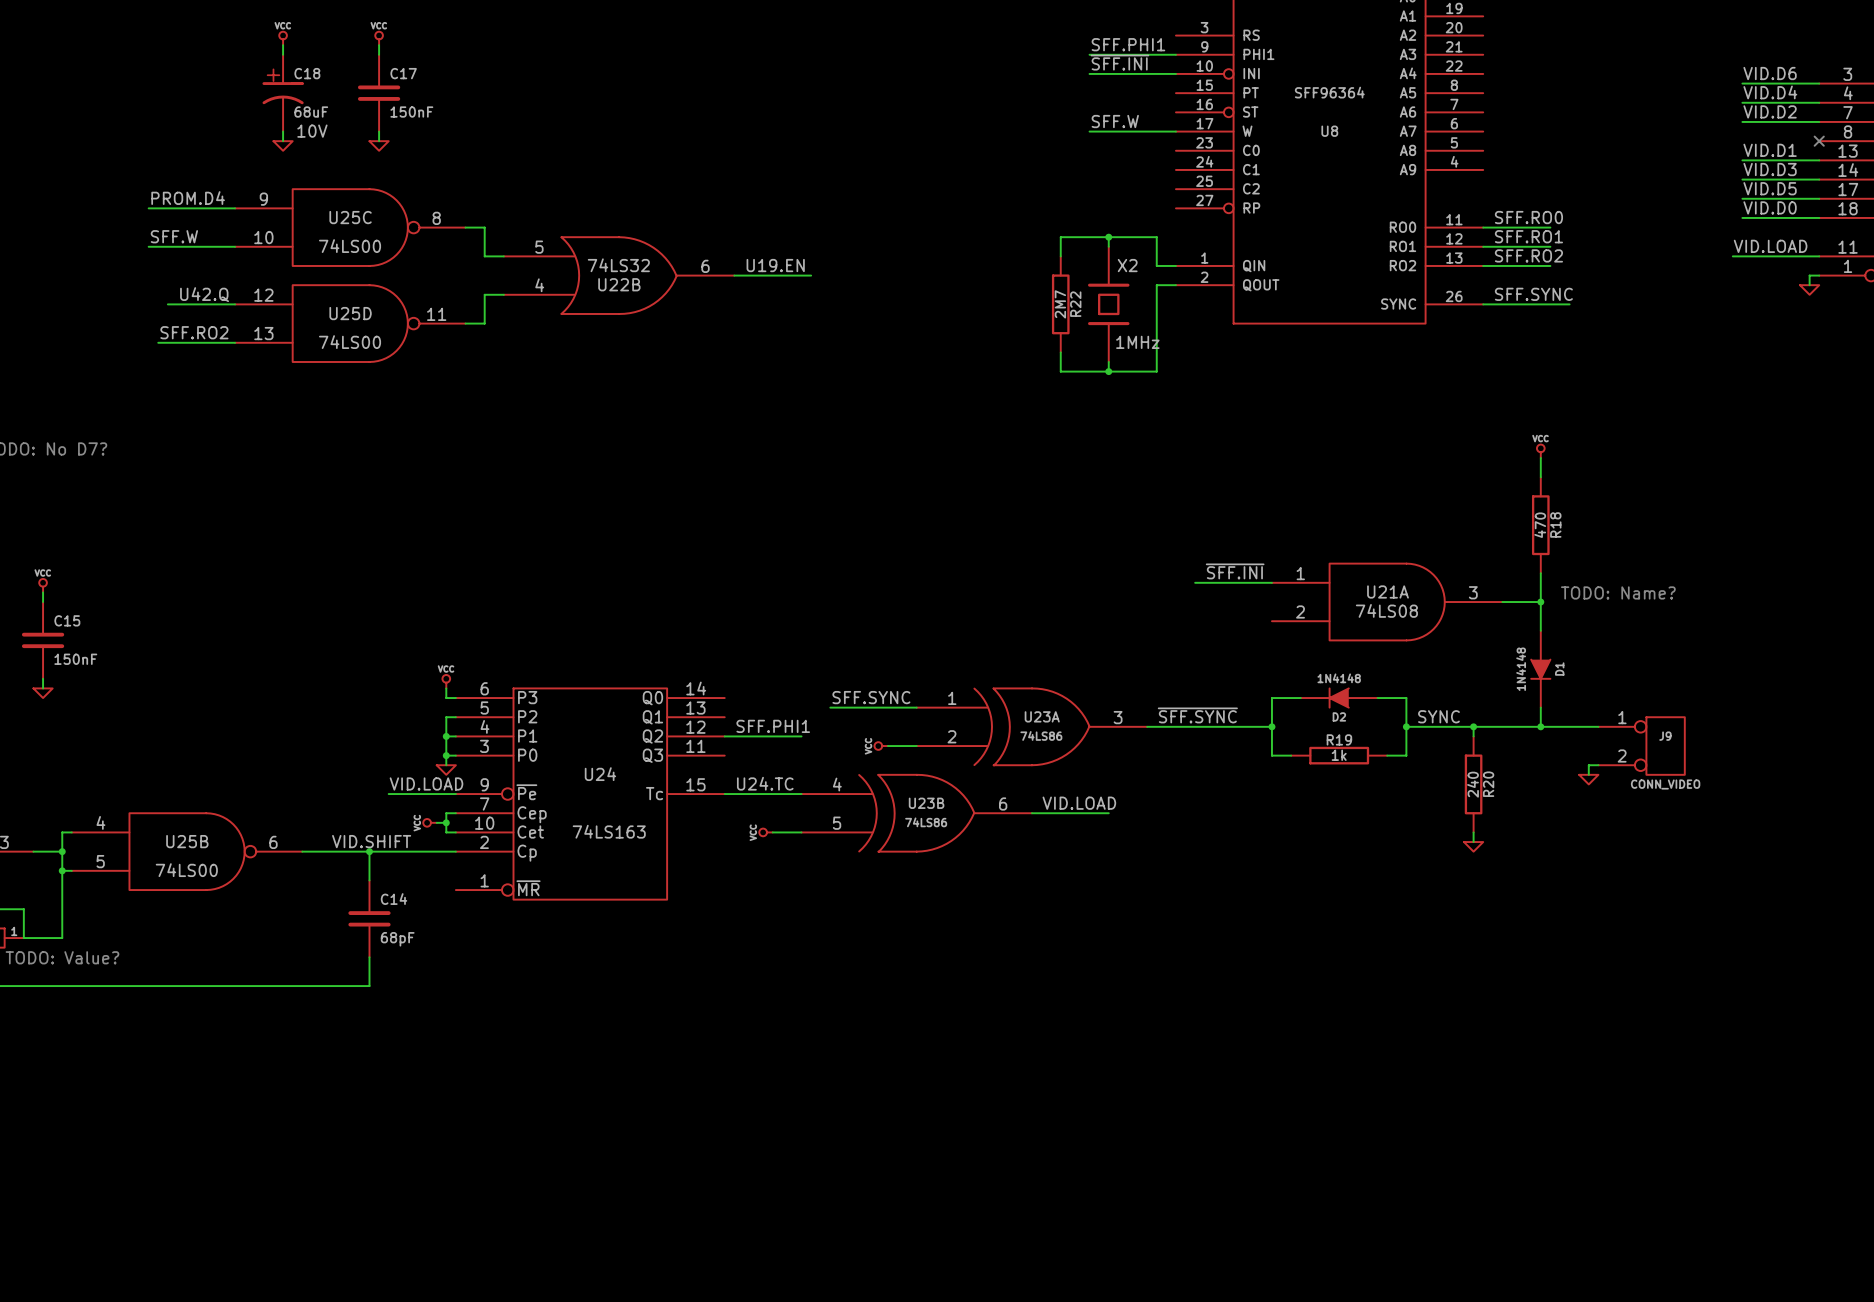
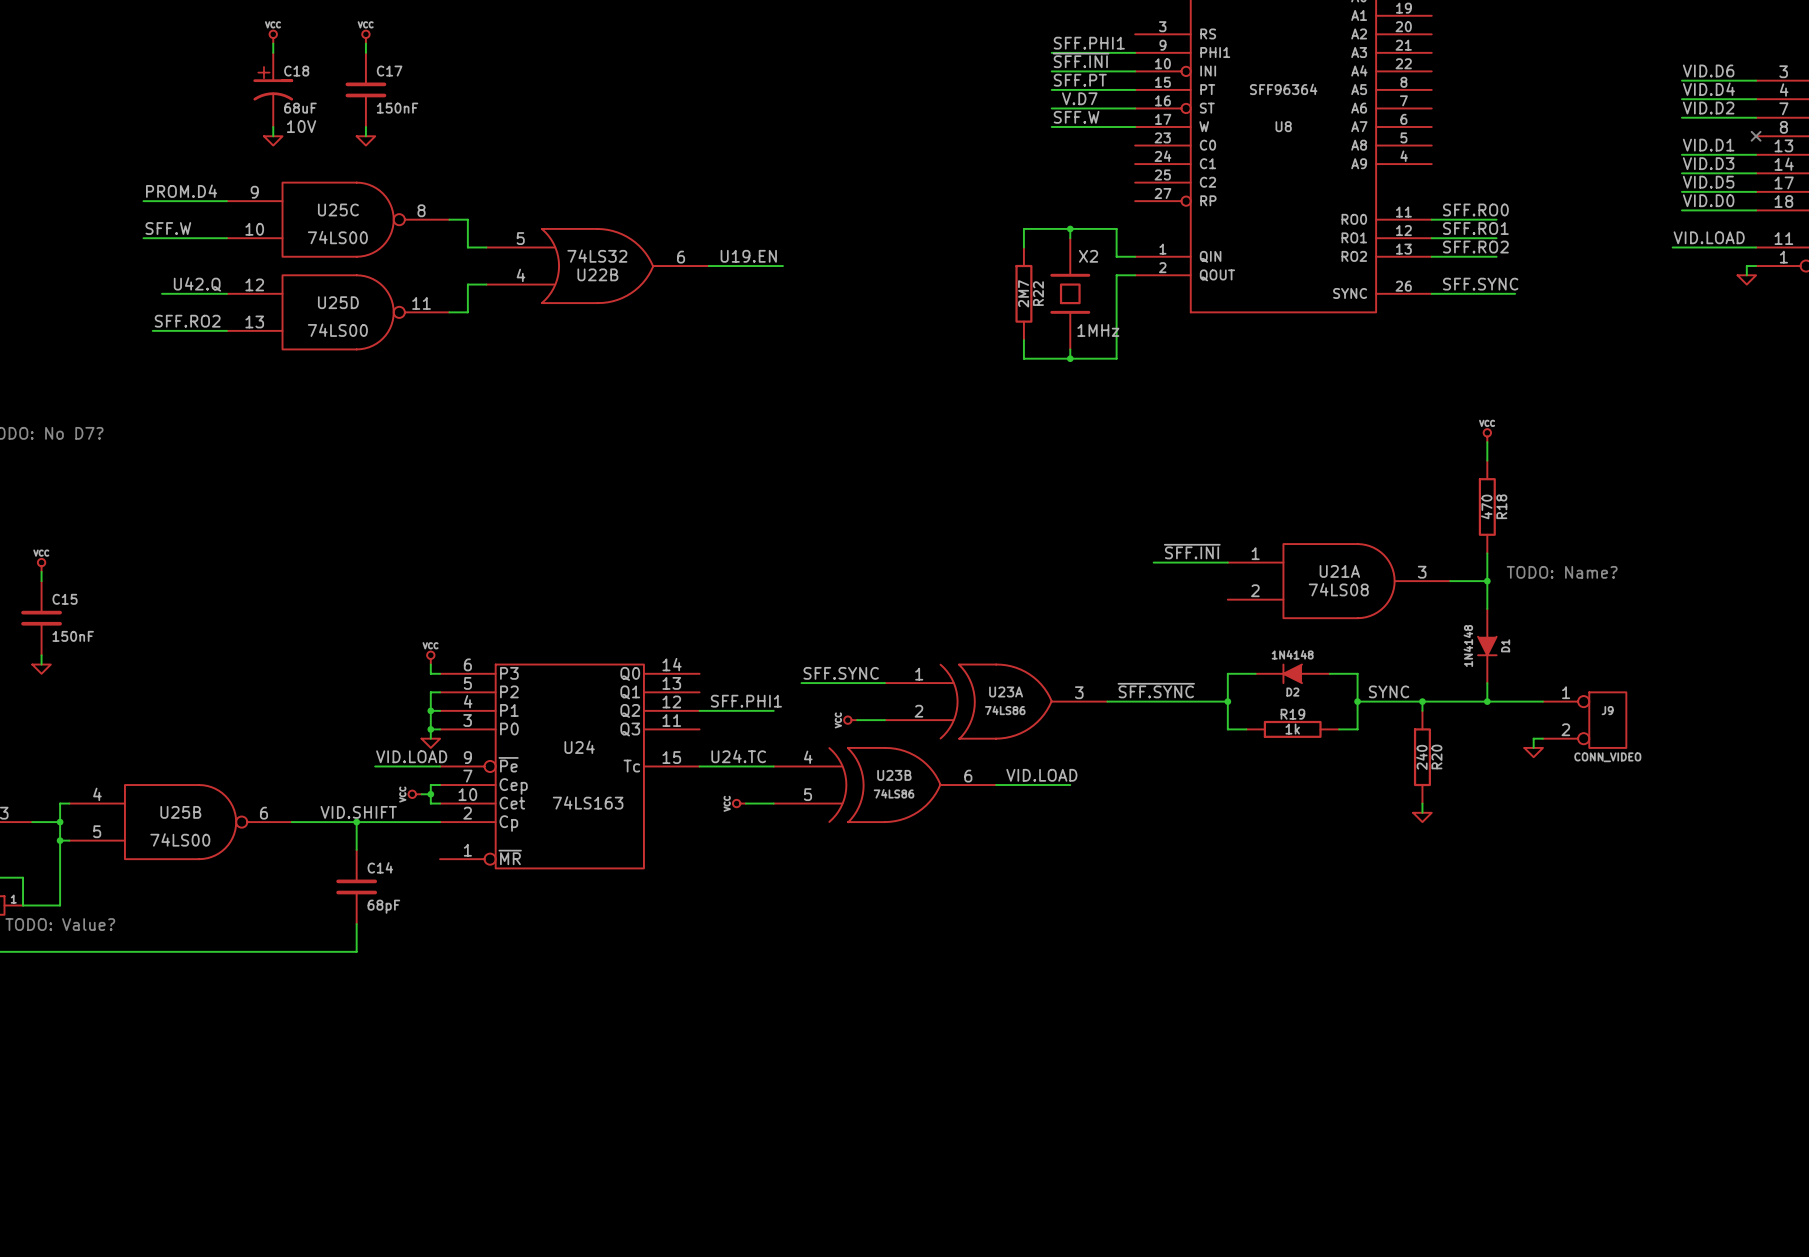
label: none -> SFF.PT (1080, 80)
wire: none -> (1051, 89) (1135, 89)
label: none -> V.D7 (1079, 98)
wire: none -> (1051, 108) (1135, 108)

